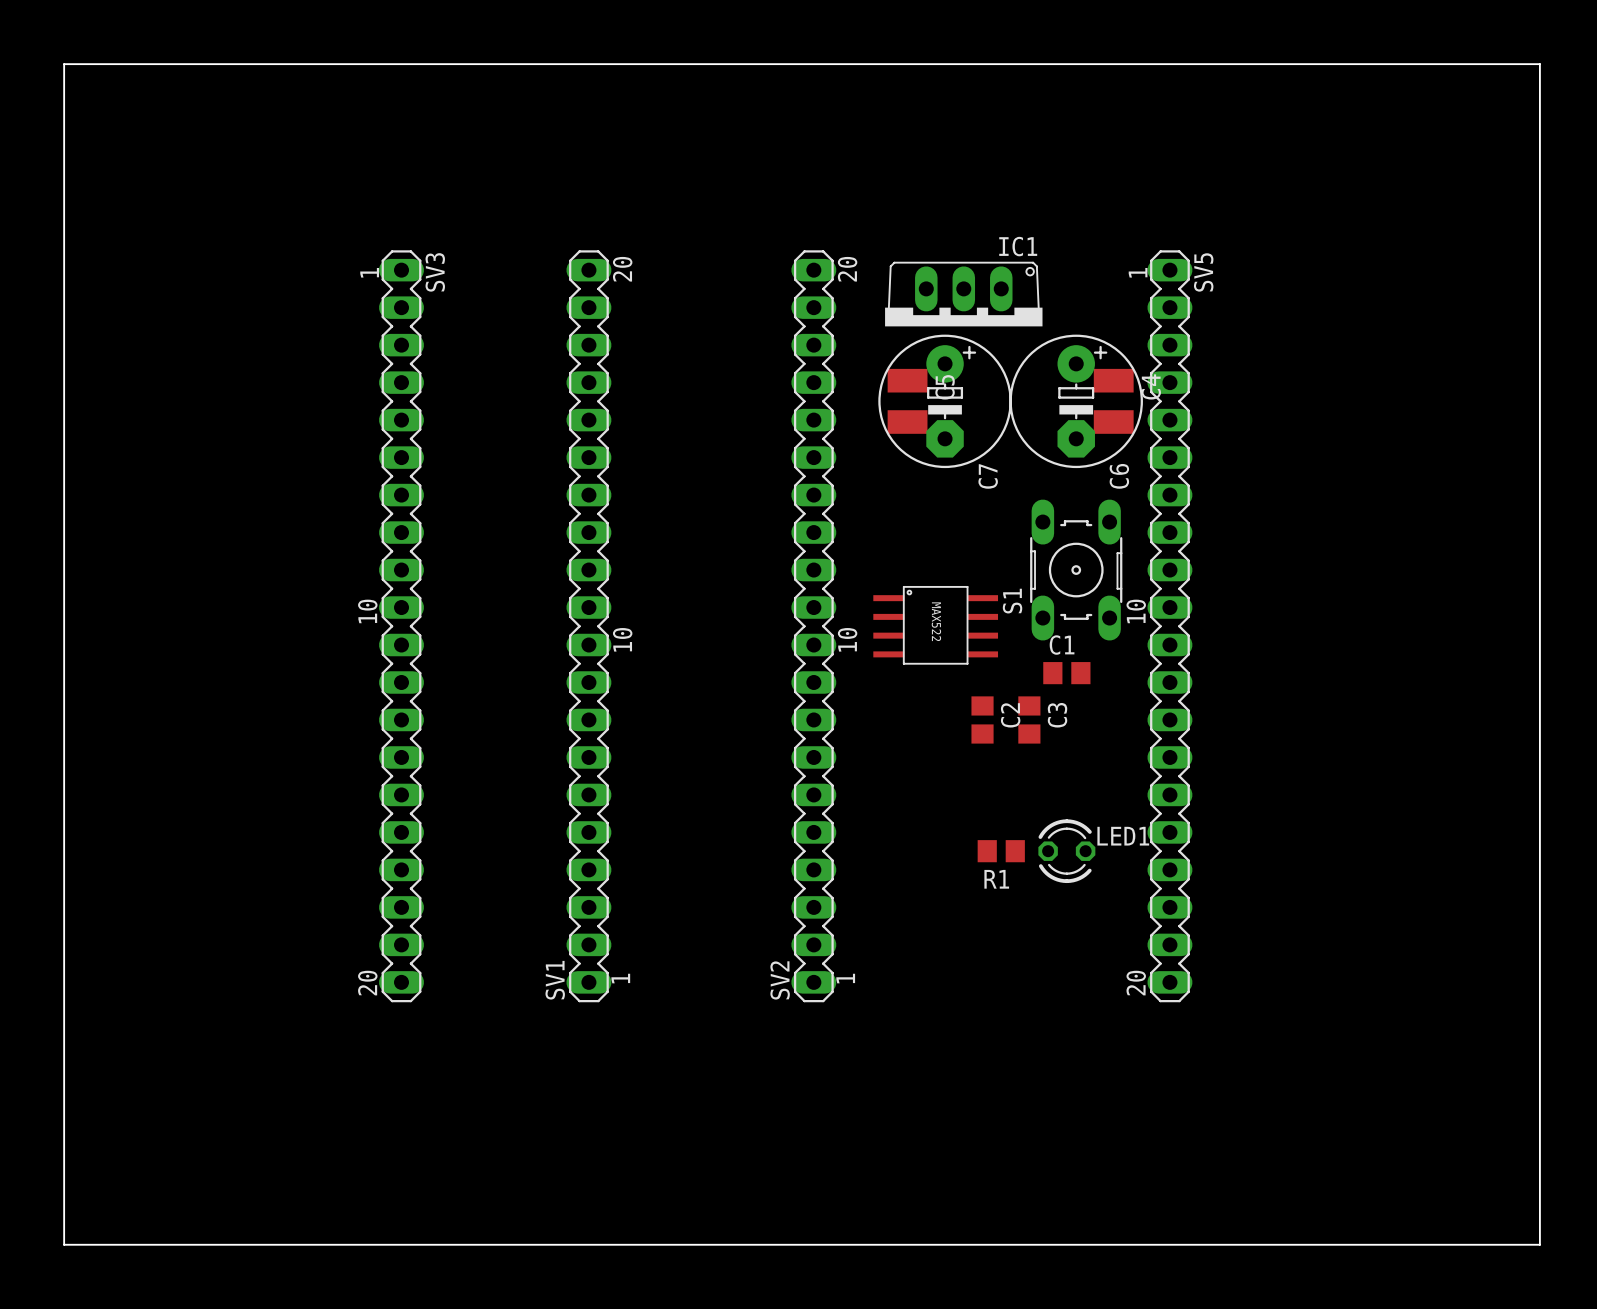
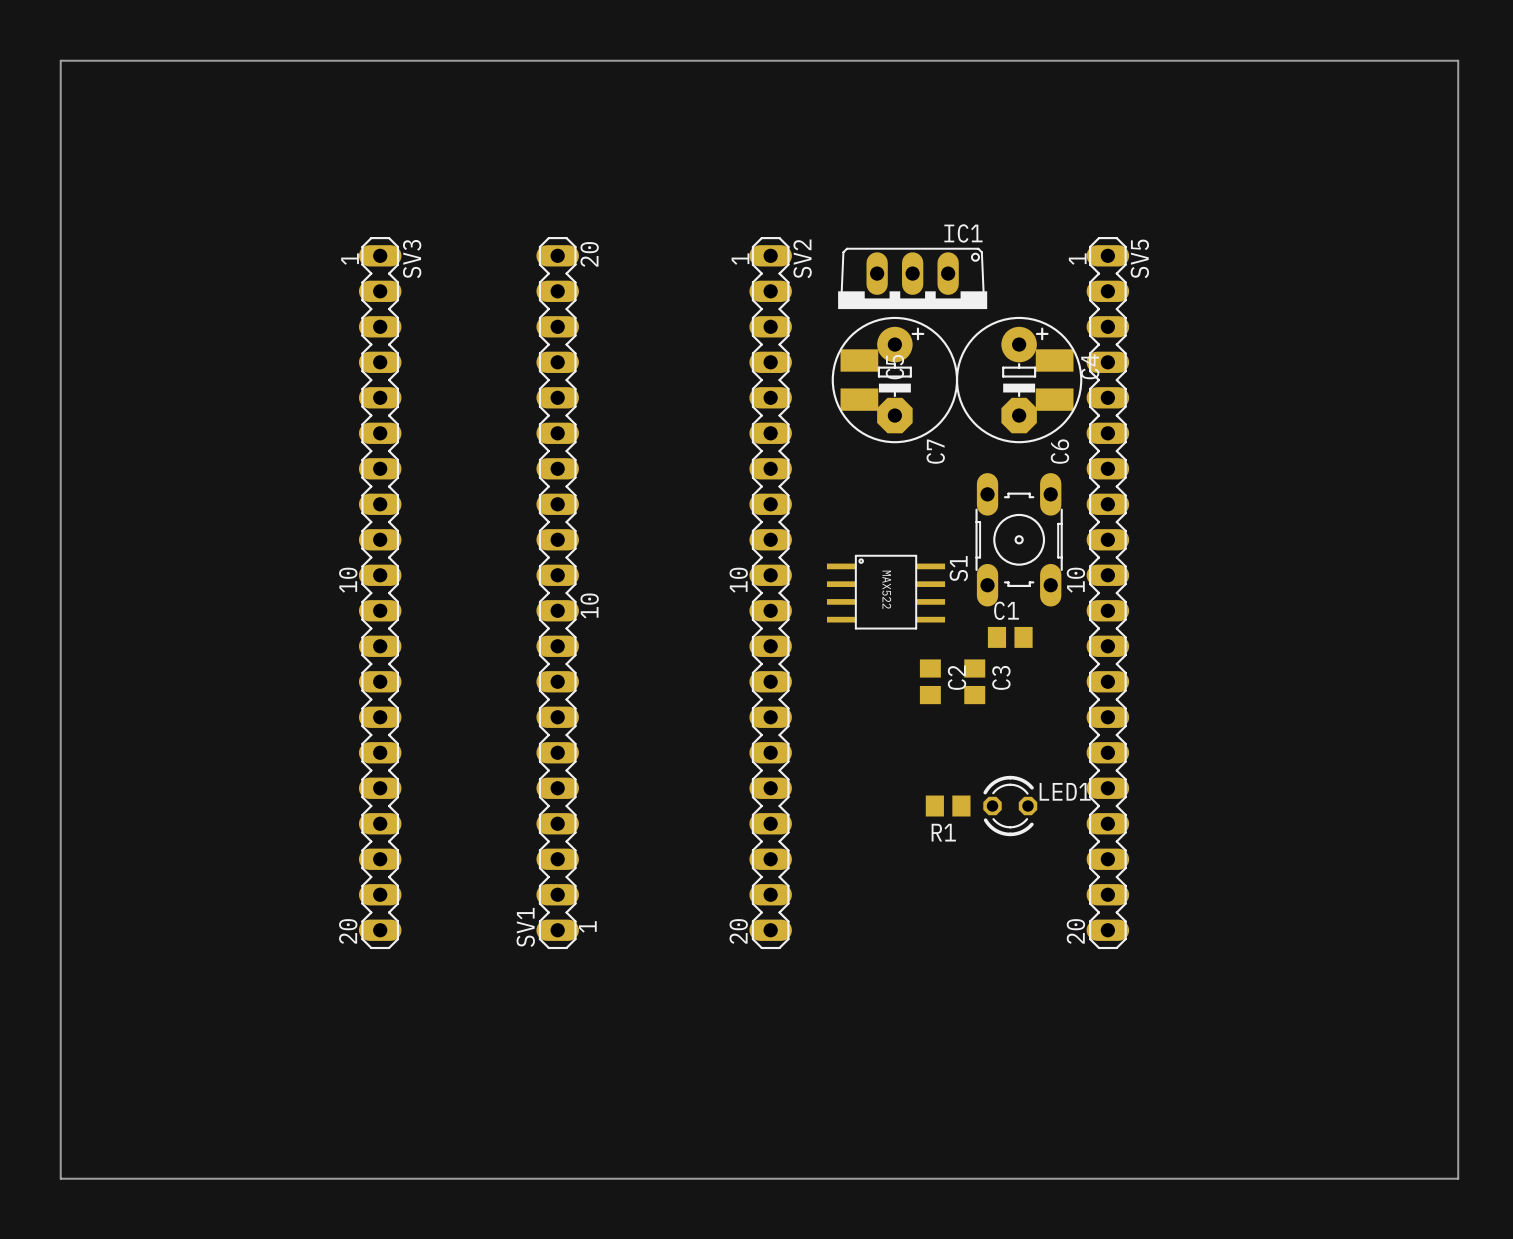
SV2 text position: 20 (847, 269) -> 20 (738, 931)
SV2 text position: 10 (847, 639) -> 10 (738, 580)
SV2 text position: 1 (845, 978) -> 1 (740, 259)
SV2 name position: SV2 (780, 980) -> SV2 (802, 258)

